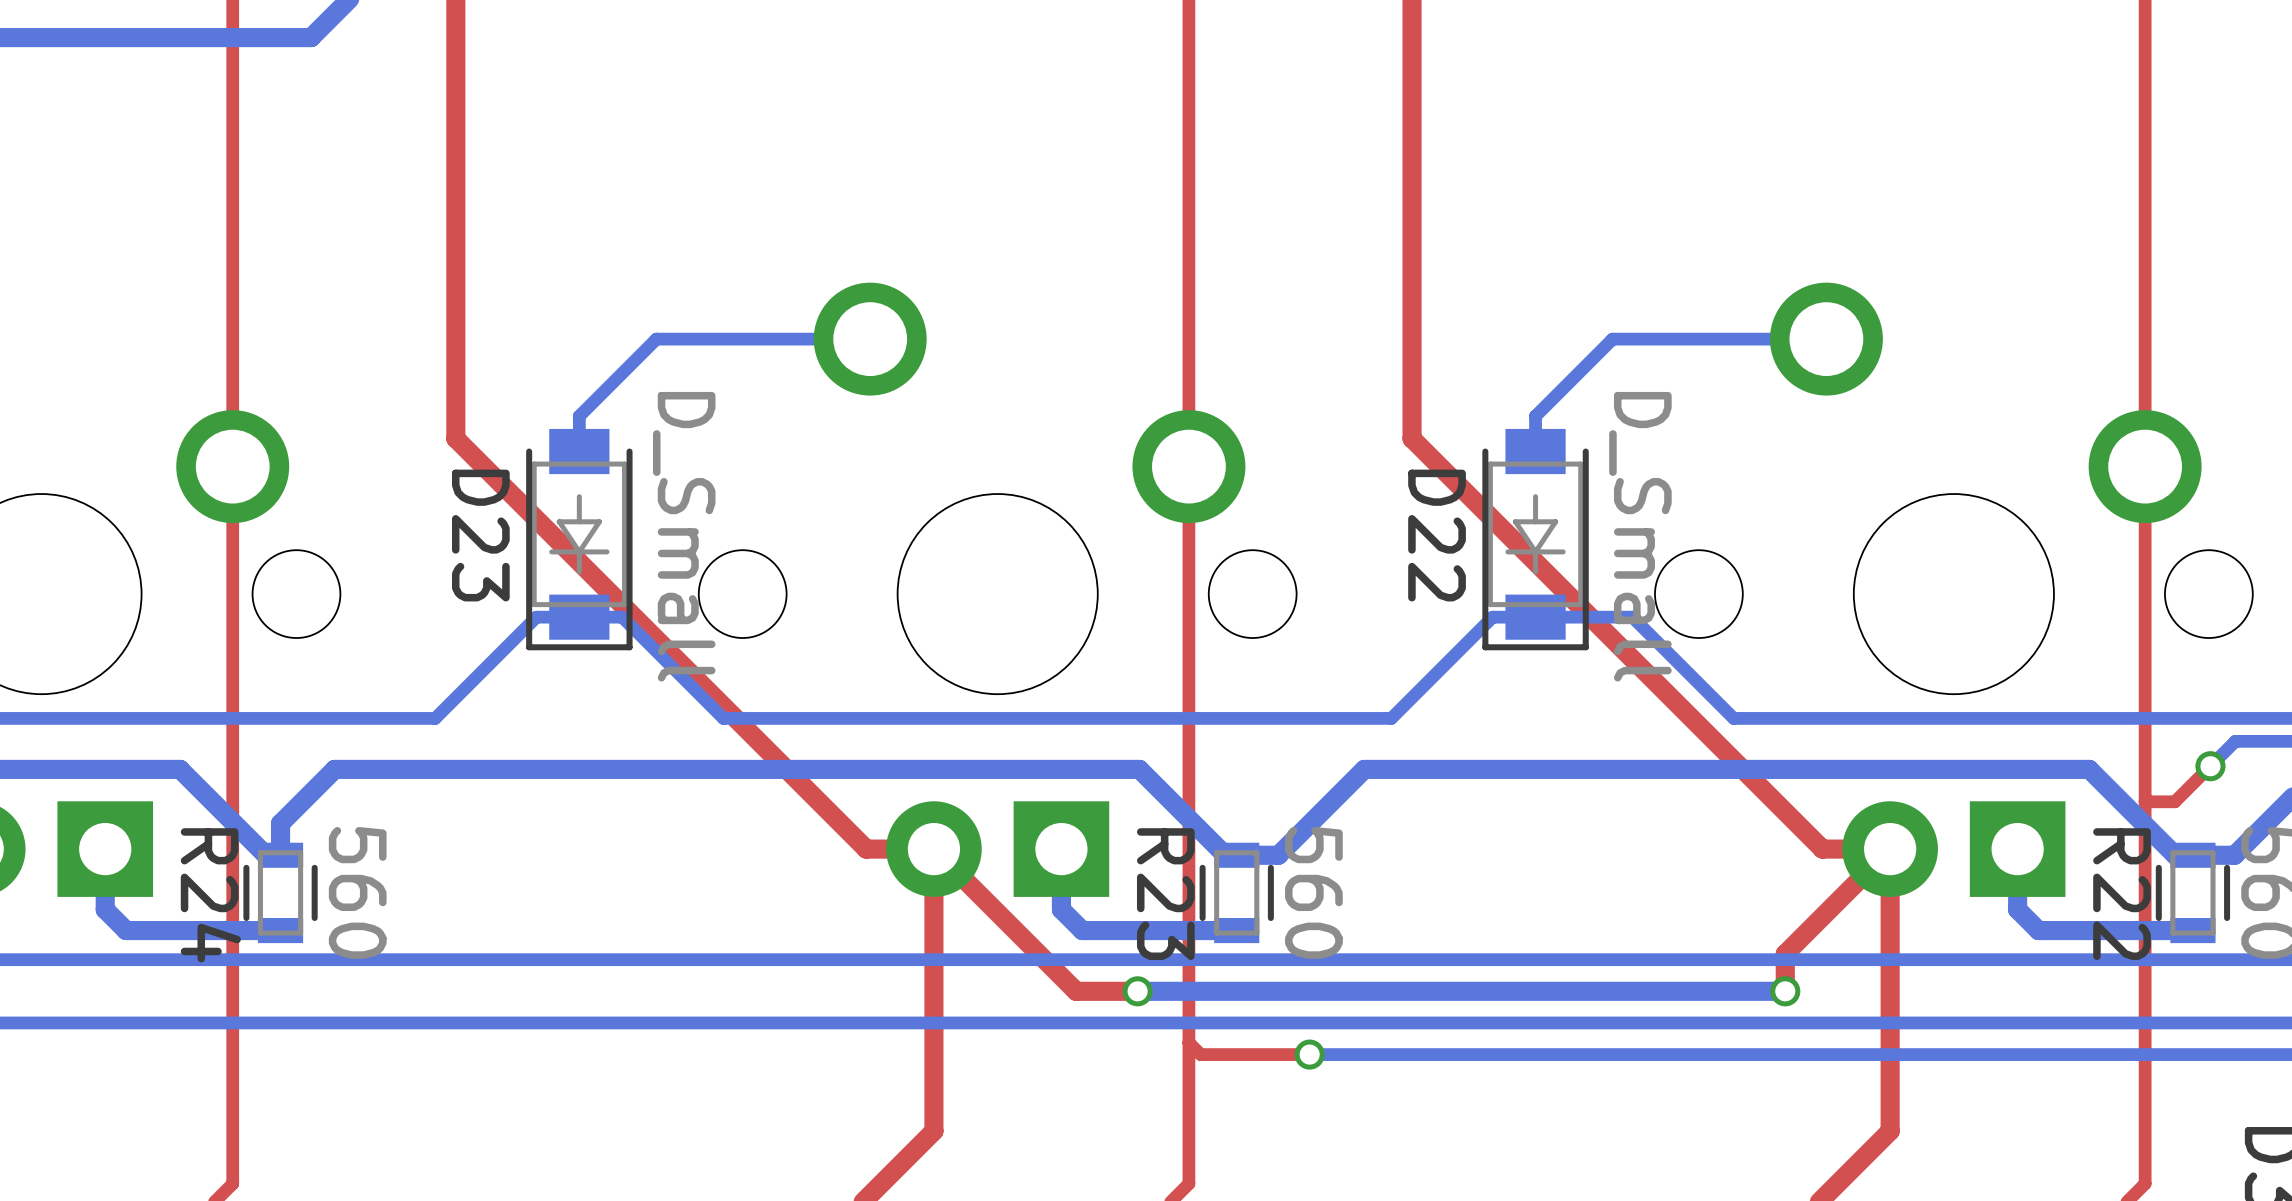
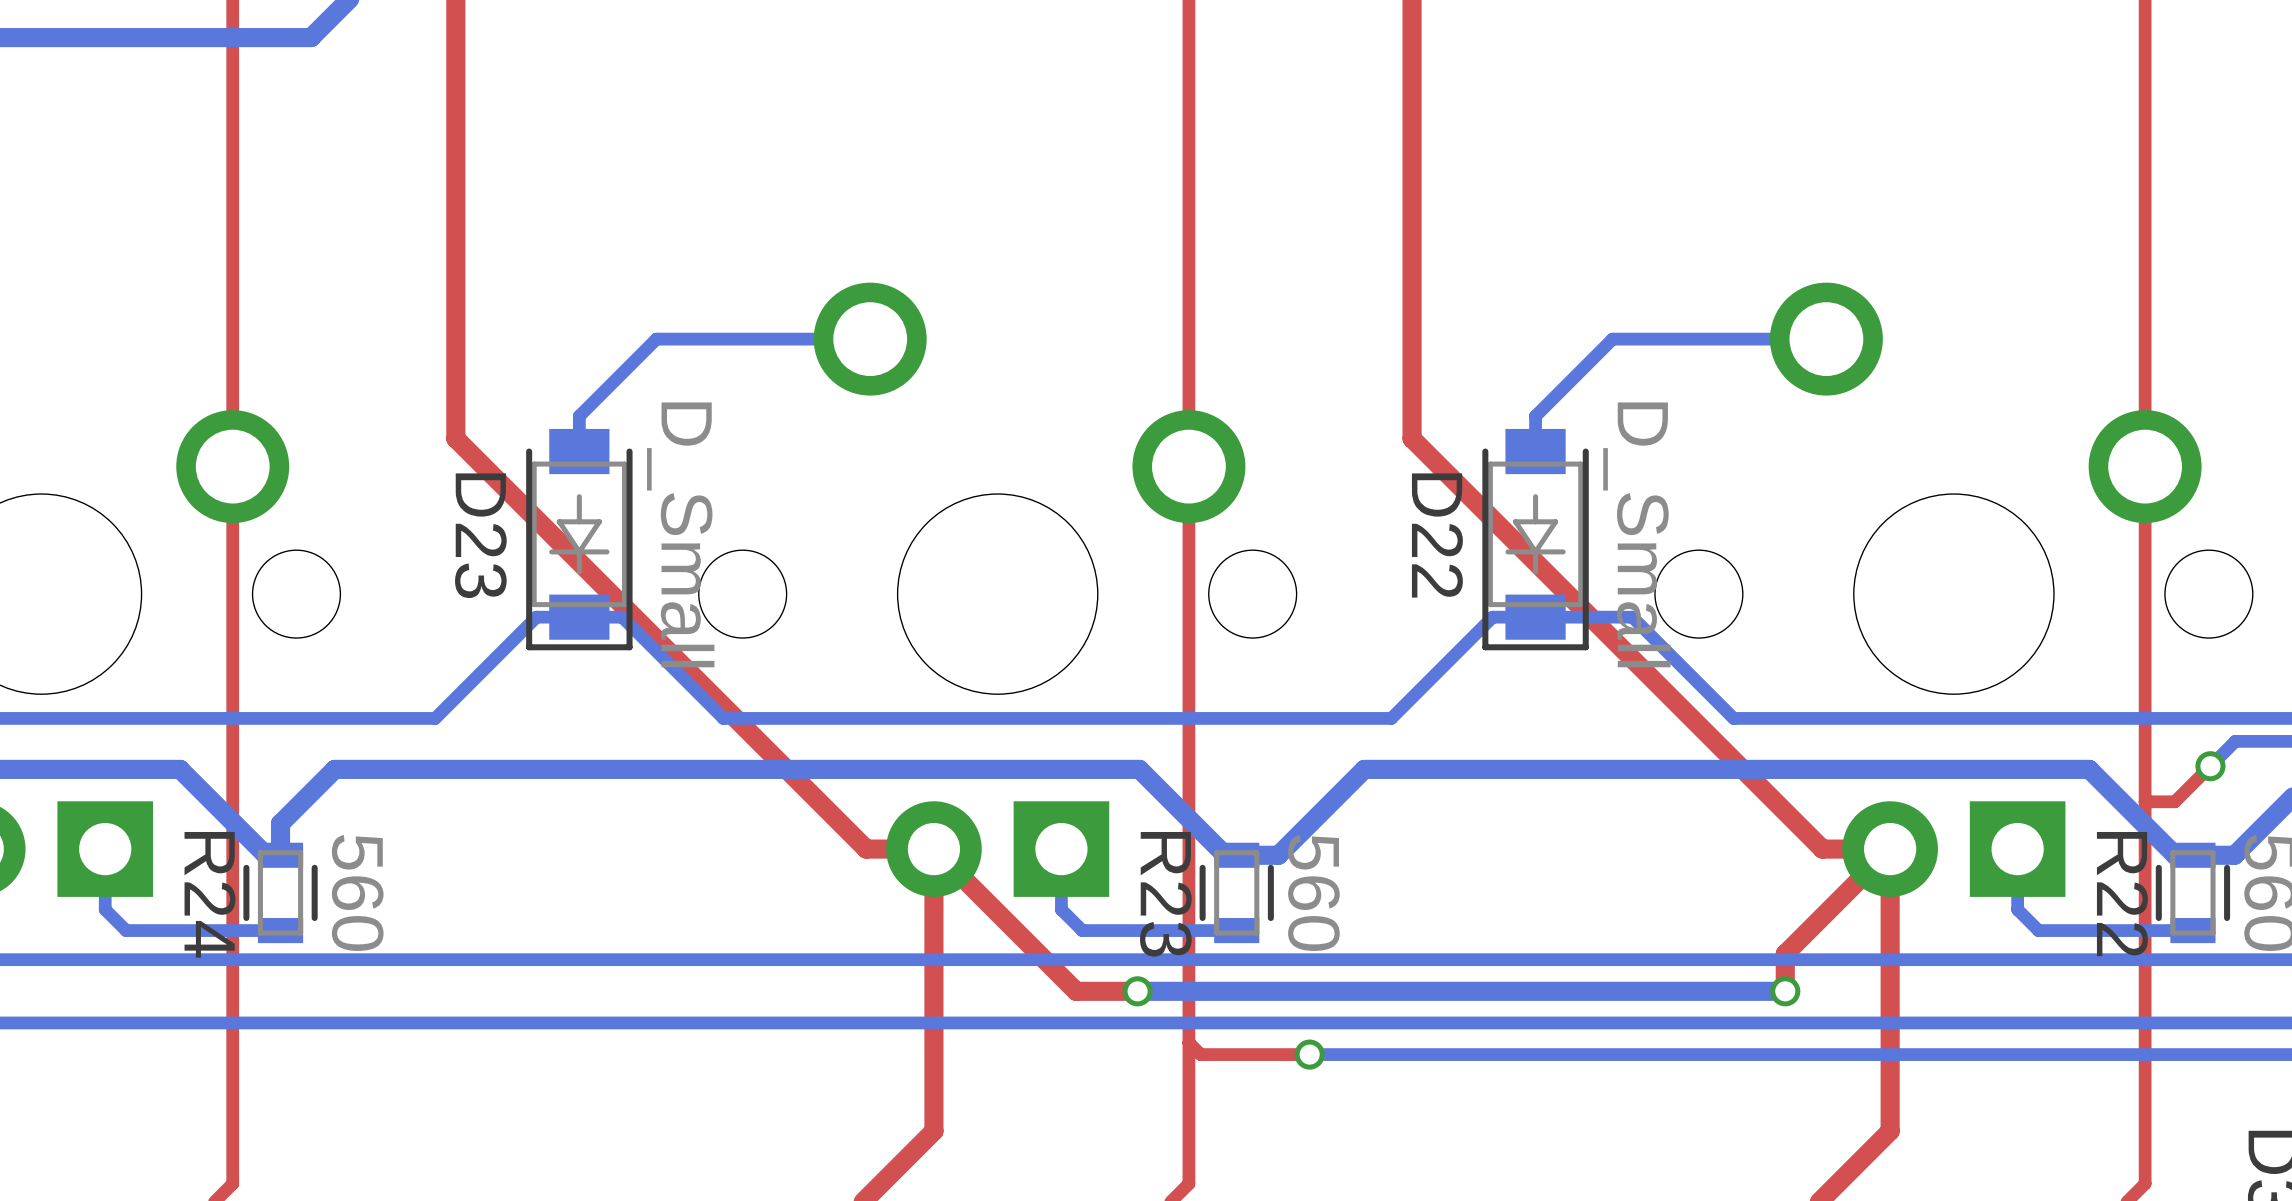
bottom track width: thick (105, 849) (105, 909) (126, 930) (280, 930) -> thin (105, 849) (105, 909) (126, 930) (280, 930)
bottom track width: thick (1061, 849) (1061, 909) (1082, 930) (1236, 930) -> thin (1061, 849) (1061, 909) (1082, 930) (1236, 930)
bottom track width: thick (2017, 849) (2017, 909) (2038, 930) (2192, 930) -> thin (2017, 849) (2017, 909) (2038, 930) (2192, 930)

